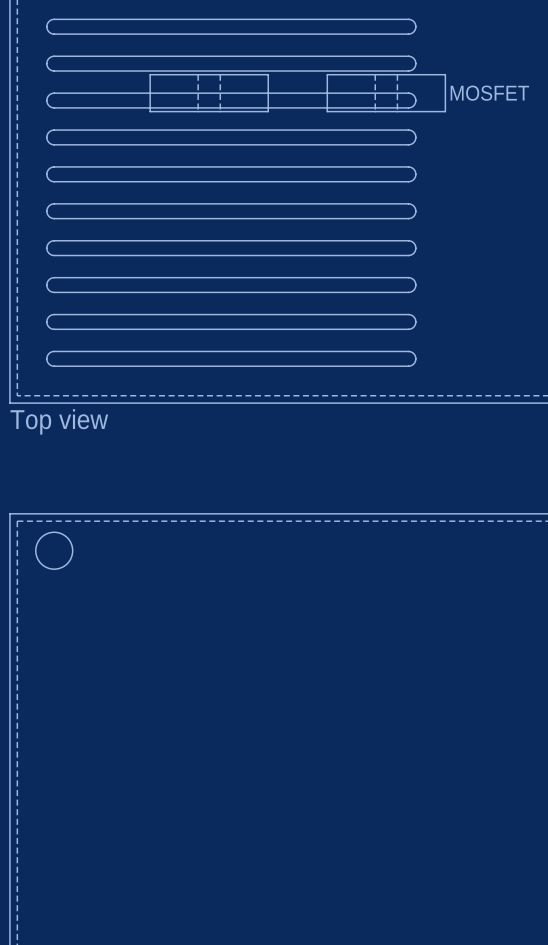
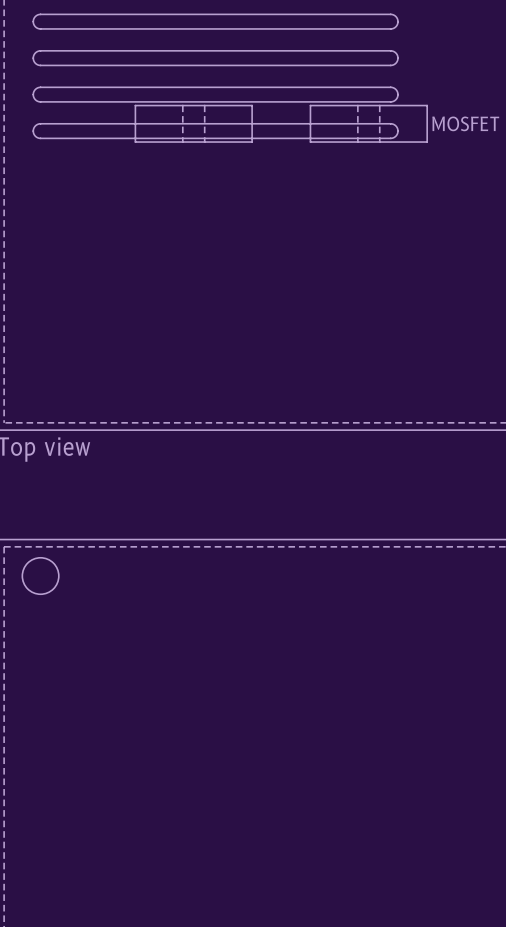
line: (54, 130) (408, 130) (413, 132) (415, 137) (413, 142) (408, 144) (54, 144) (49, 142) (46, 137) (49, 132) (54, 130) -> none
line: (54, 166) (408, 166) (413, 169) (415, 174) (413, 179) (408, 181) (54, 181) (49, 179) (46, 174) (49, 169) (54, 166) -> none
line: (54, 203) (408, 203) (413, 206) (415, 211) (413, 216) (408, 218) (54, 218) (49, 216) (46, 211) (49, 206) (54, 203) -> none
line: (54, 240) (408, 240) (413, 242) (415, 248) (413, 253) (408, 255) (54, 255) (49, 253) (46, 248) (49, 242) (54, 240) -> none
line: (54, 277) (408, 277) (413, 279) (415, 285) (413, 290) (408, 292) (54, 292) (49, 290) (46, 285) (49, 279) (54, 277) -> none
line: (54, 314) (408, 314) (413, 316) (415, 321) (413, 327) (408, 329) (54, 329) (49, 327) (46, 321) (49, 316) (54, 314) -> none
line: (54, 351) (408, 351) (413, 353) (415, 358) (413, 364) (408, 366) (54, 366) (49, 364) (46, 358) (49, 353) (54, 351) -> none

